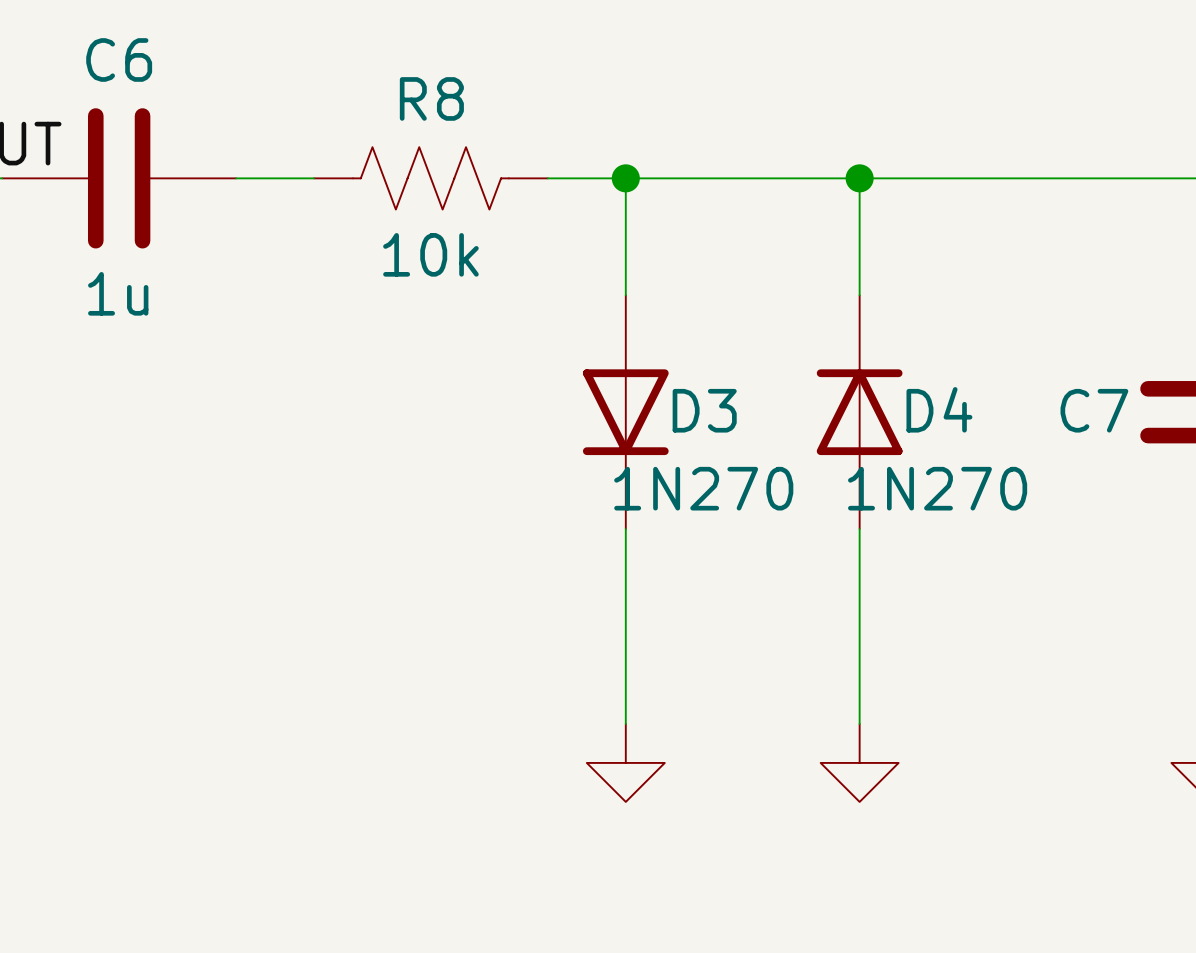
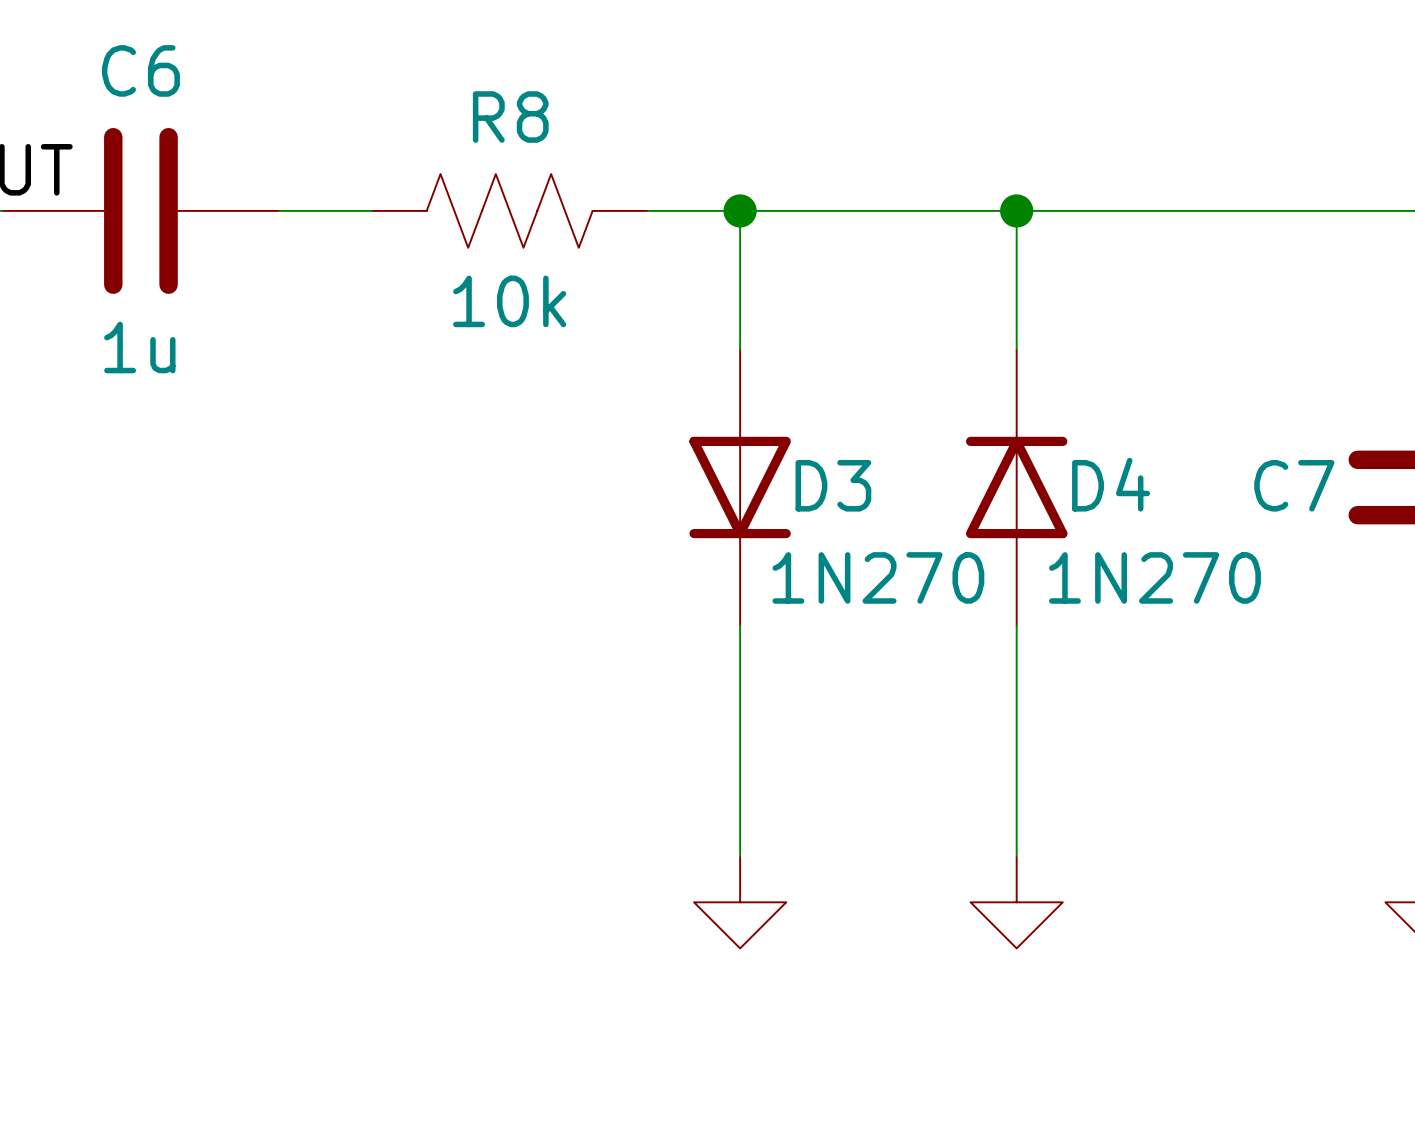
D3 value position: 1N270 (703, 488) -> 1N270 (878, 577)
D4 value position: 1N270 (937, 488) -> 1N270 (1154, 577)

